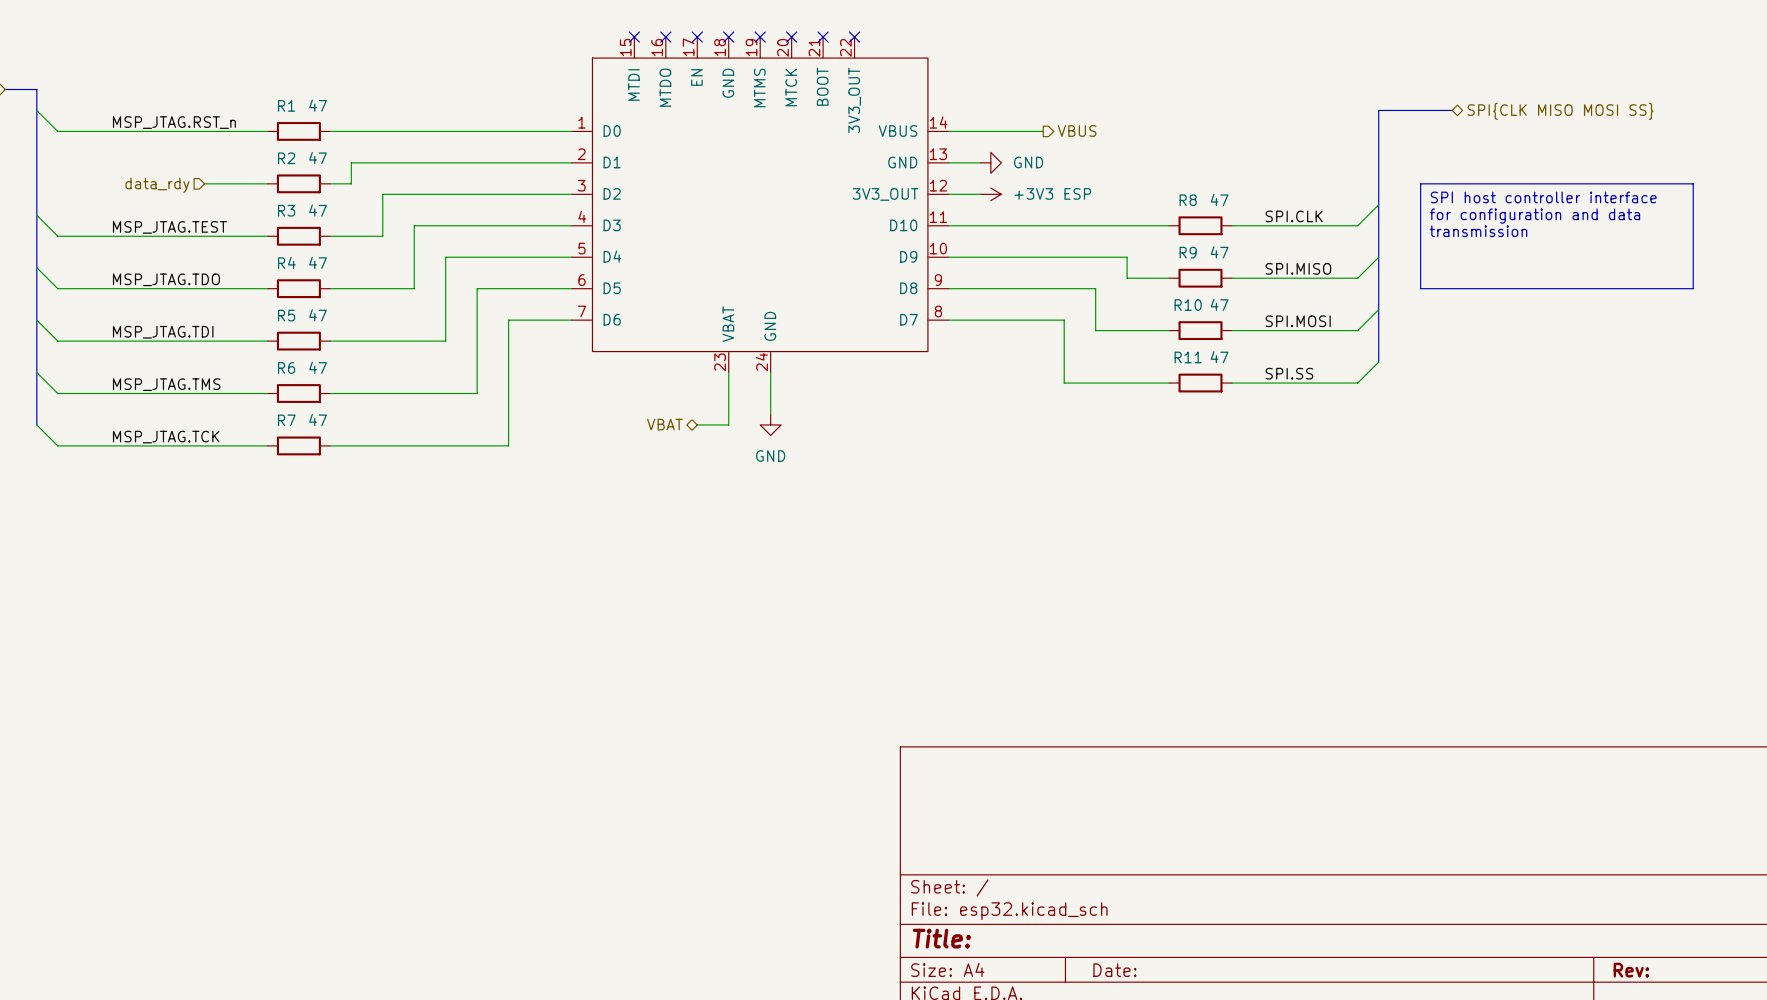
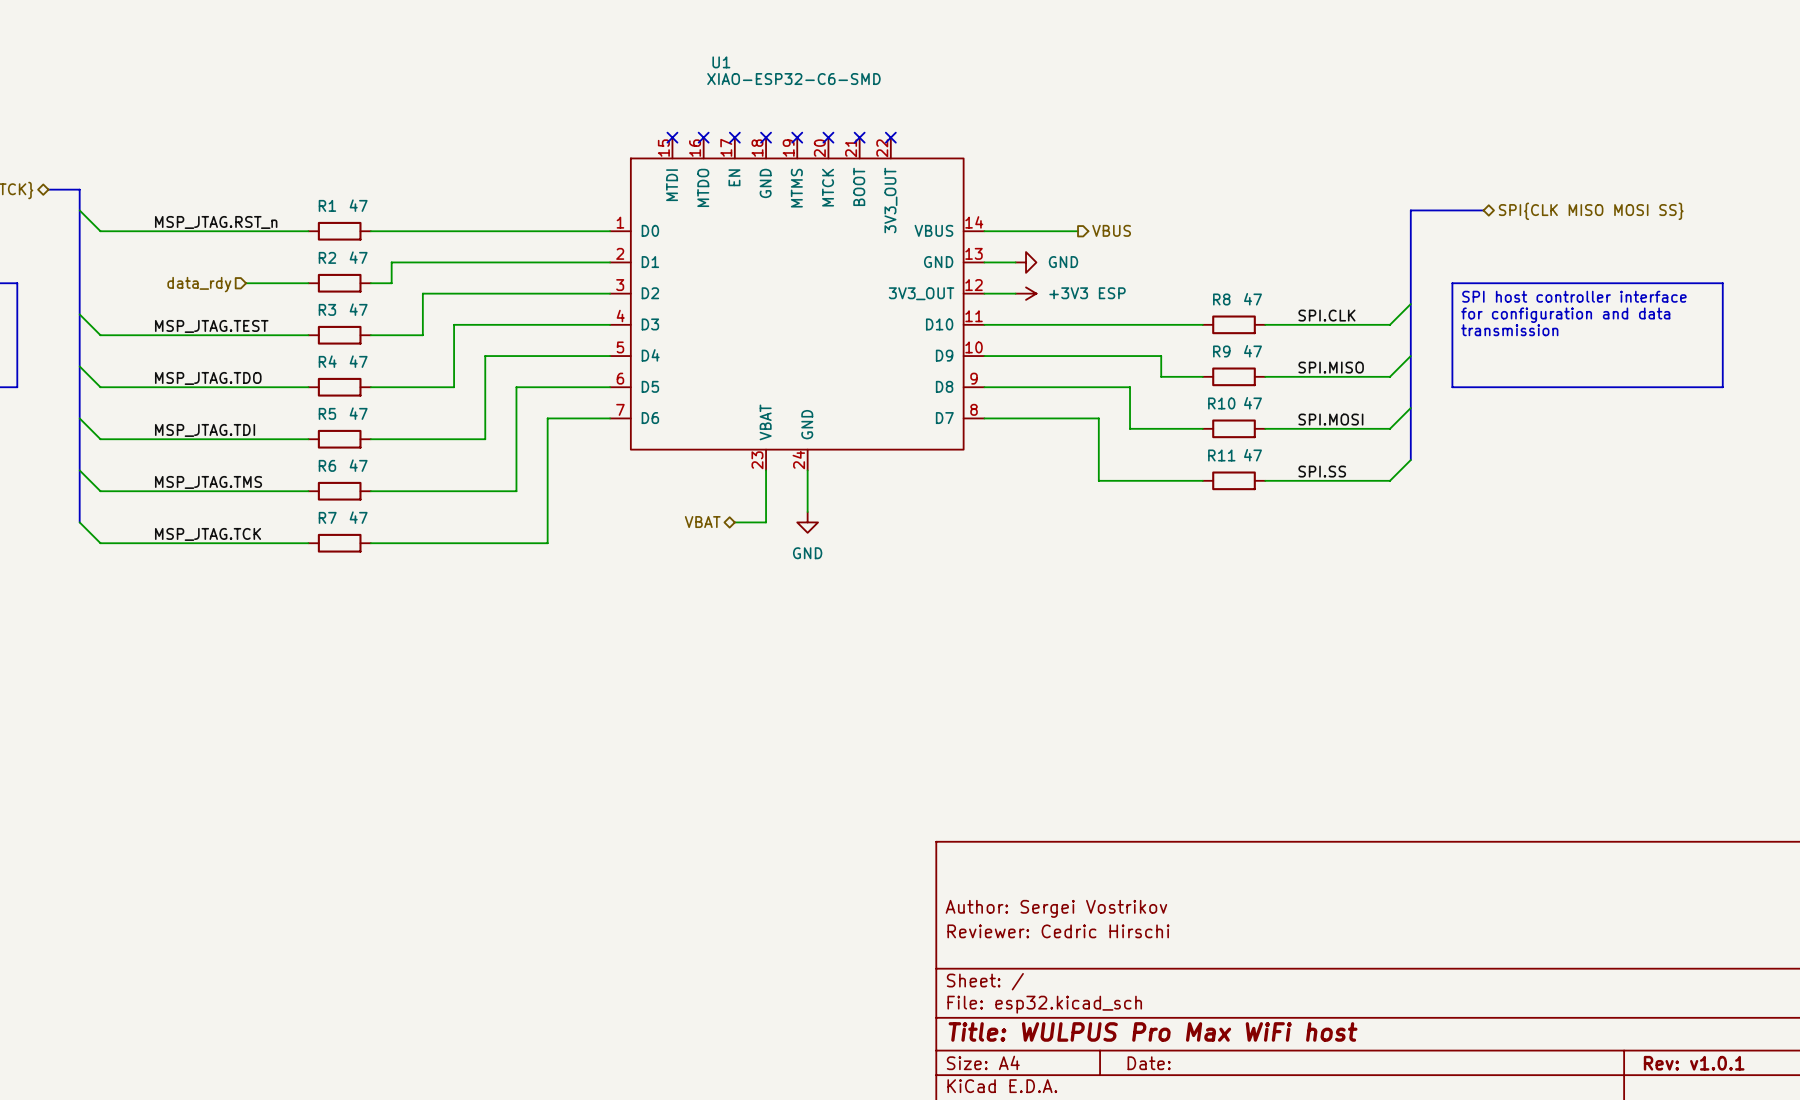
title block: none -> Author: Sergei Vostrikov (1056, 908)
title block: none -> Reviewer: Cedric Hirschi (1058, 931)
title block: Title: (941, 938) -> Title: WULPUS Pro Max WiFi host (1153, 1031)
title block: Rev: (1631, 970) -> Rev: v1.0.1 (1694, 1063)

